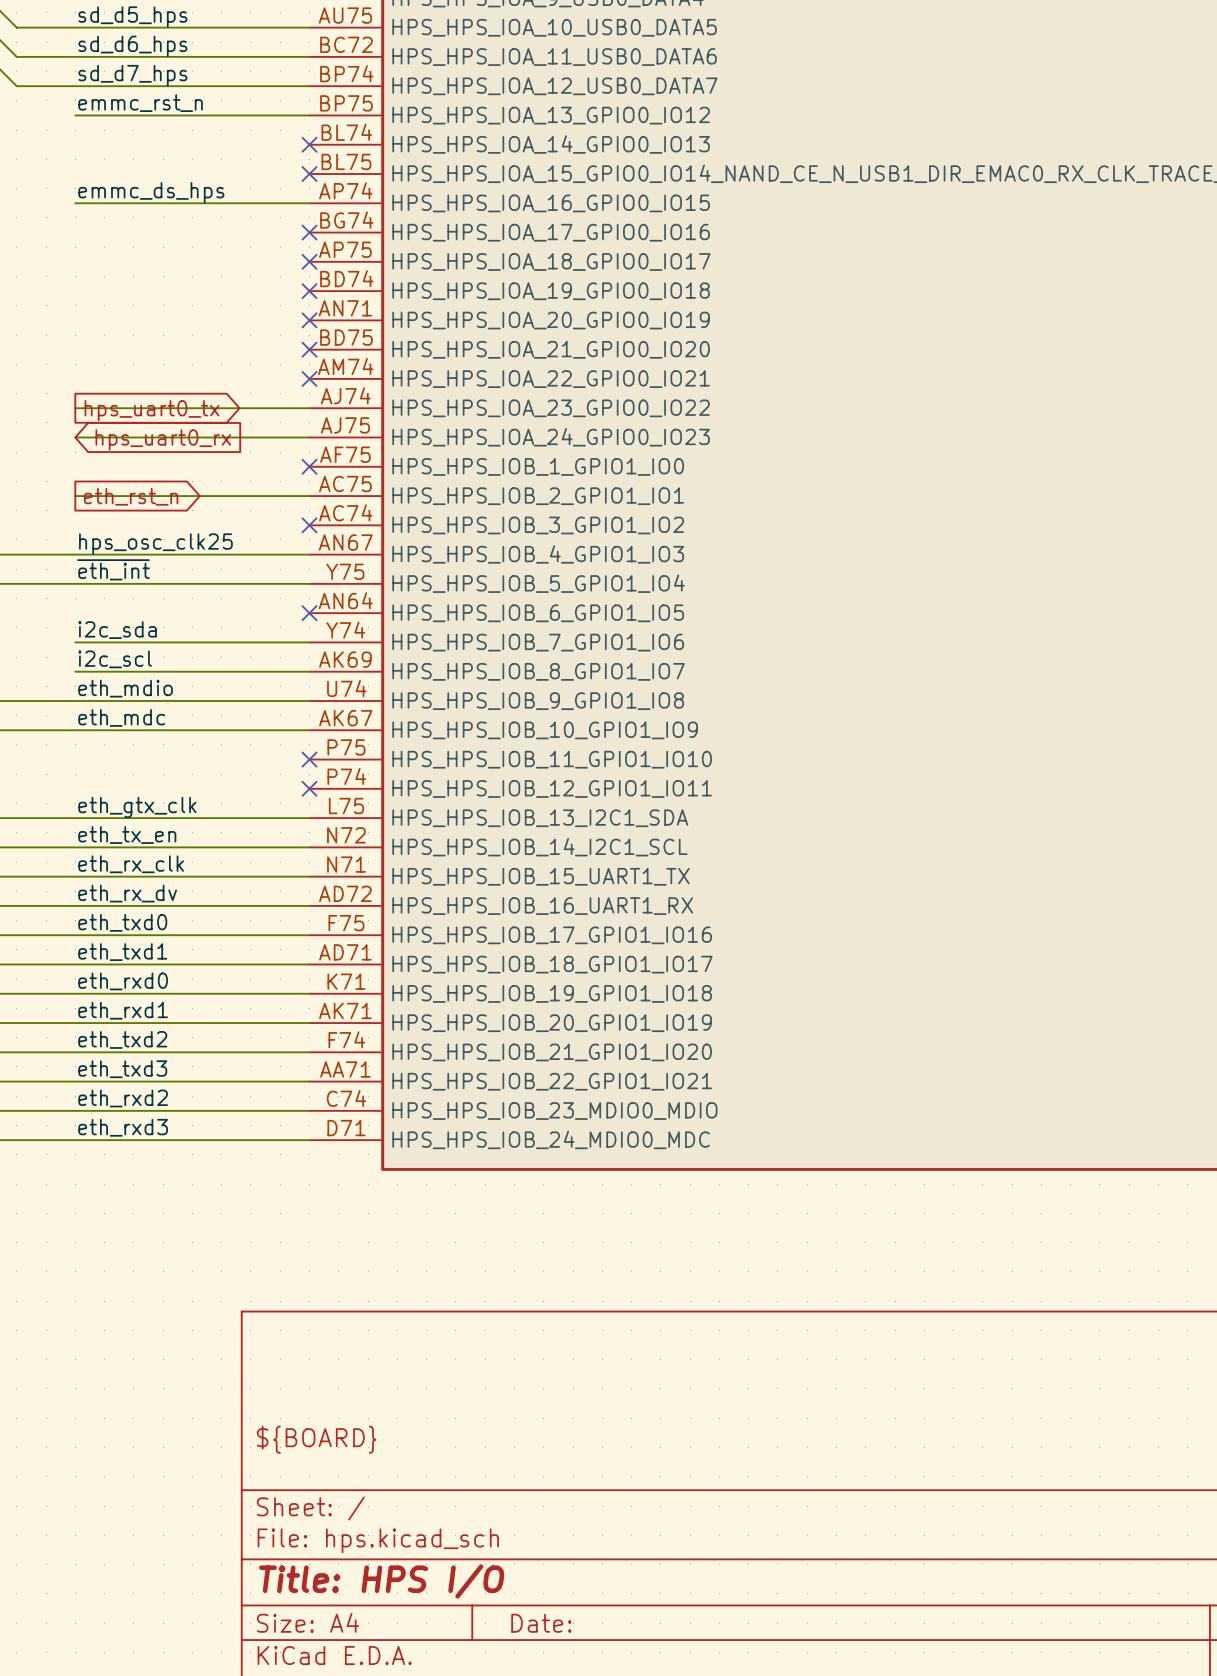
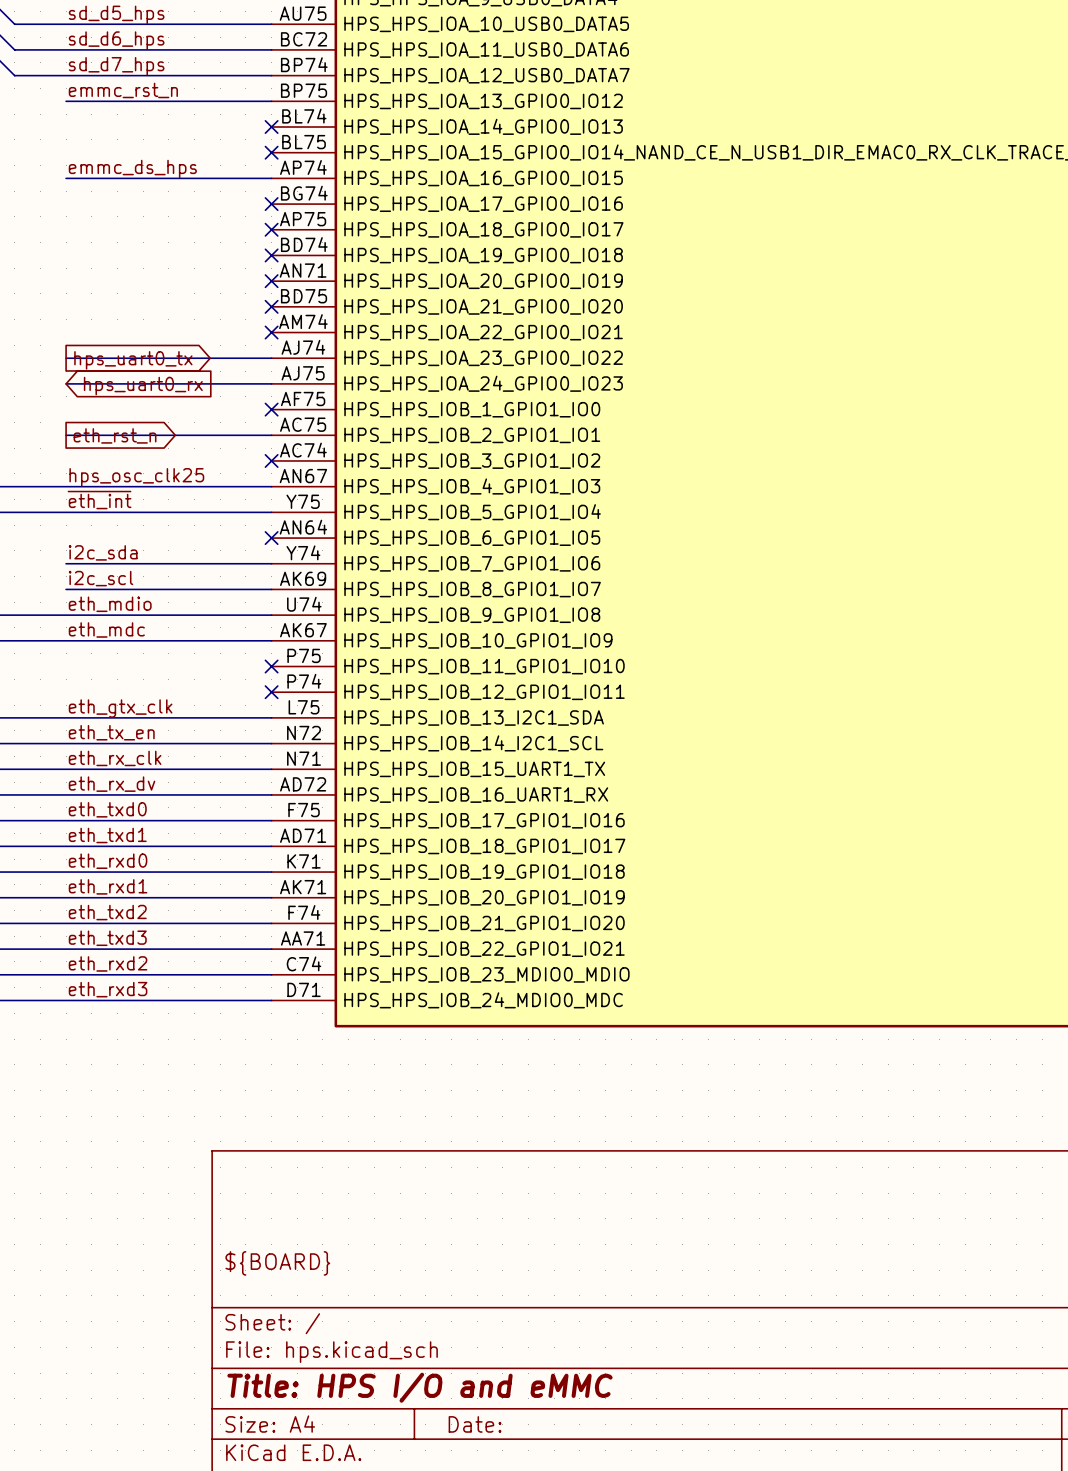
title block: Title: HPS I/O (381, 1581) -> Title: HPS I/O and eMMC (419, 1387)

